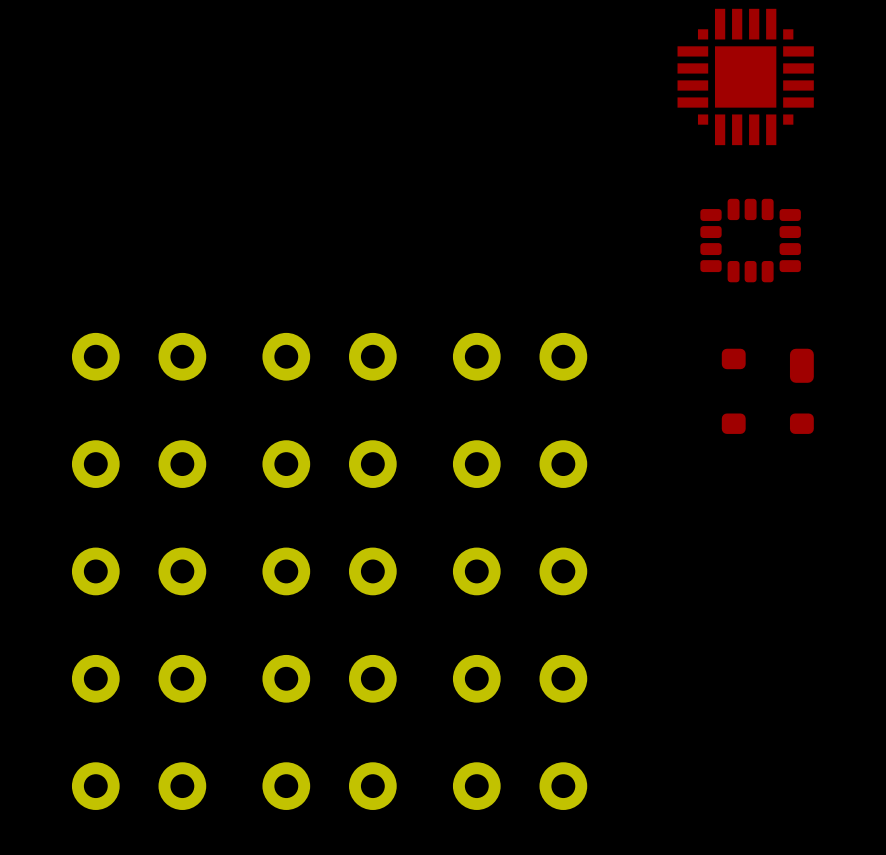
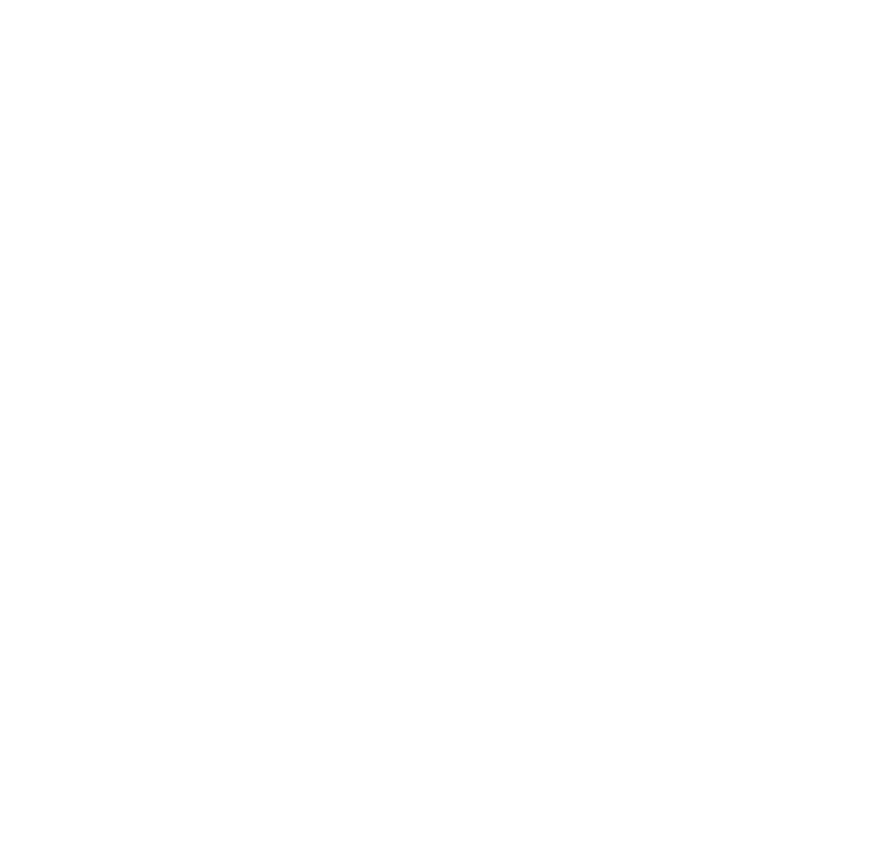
part: (745, 76) -> none
part: (750, 240) -> none
part: (139, 356) -> none
part: (329, 356) -> none
part: (520, 356) -> none
part: (767, 391) -> none
part: (139, 464) -> none
part: (329, 464) -> none
part: (520, 464) -> none
part: (139, 571) -> none
part: (329, 571) -> none
part: (520, 571) -> none
part: (139, 678) -> none
part: (329, 678) -> none
part: (520, 678) -> none
part: (139, 786) -> none
part: (329, 786) -> none
part: (520, 786) -> none

